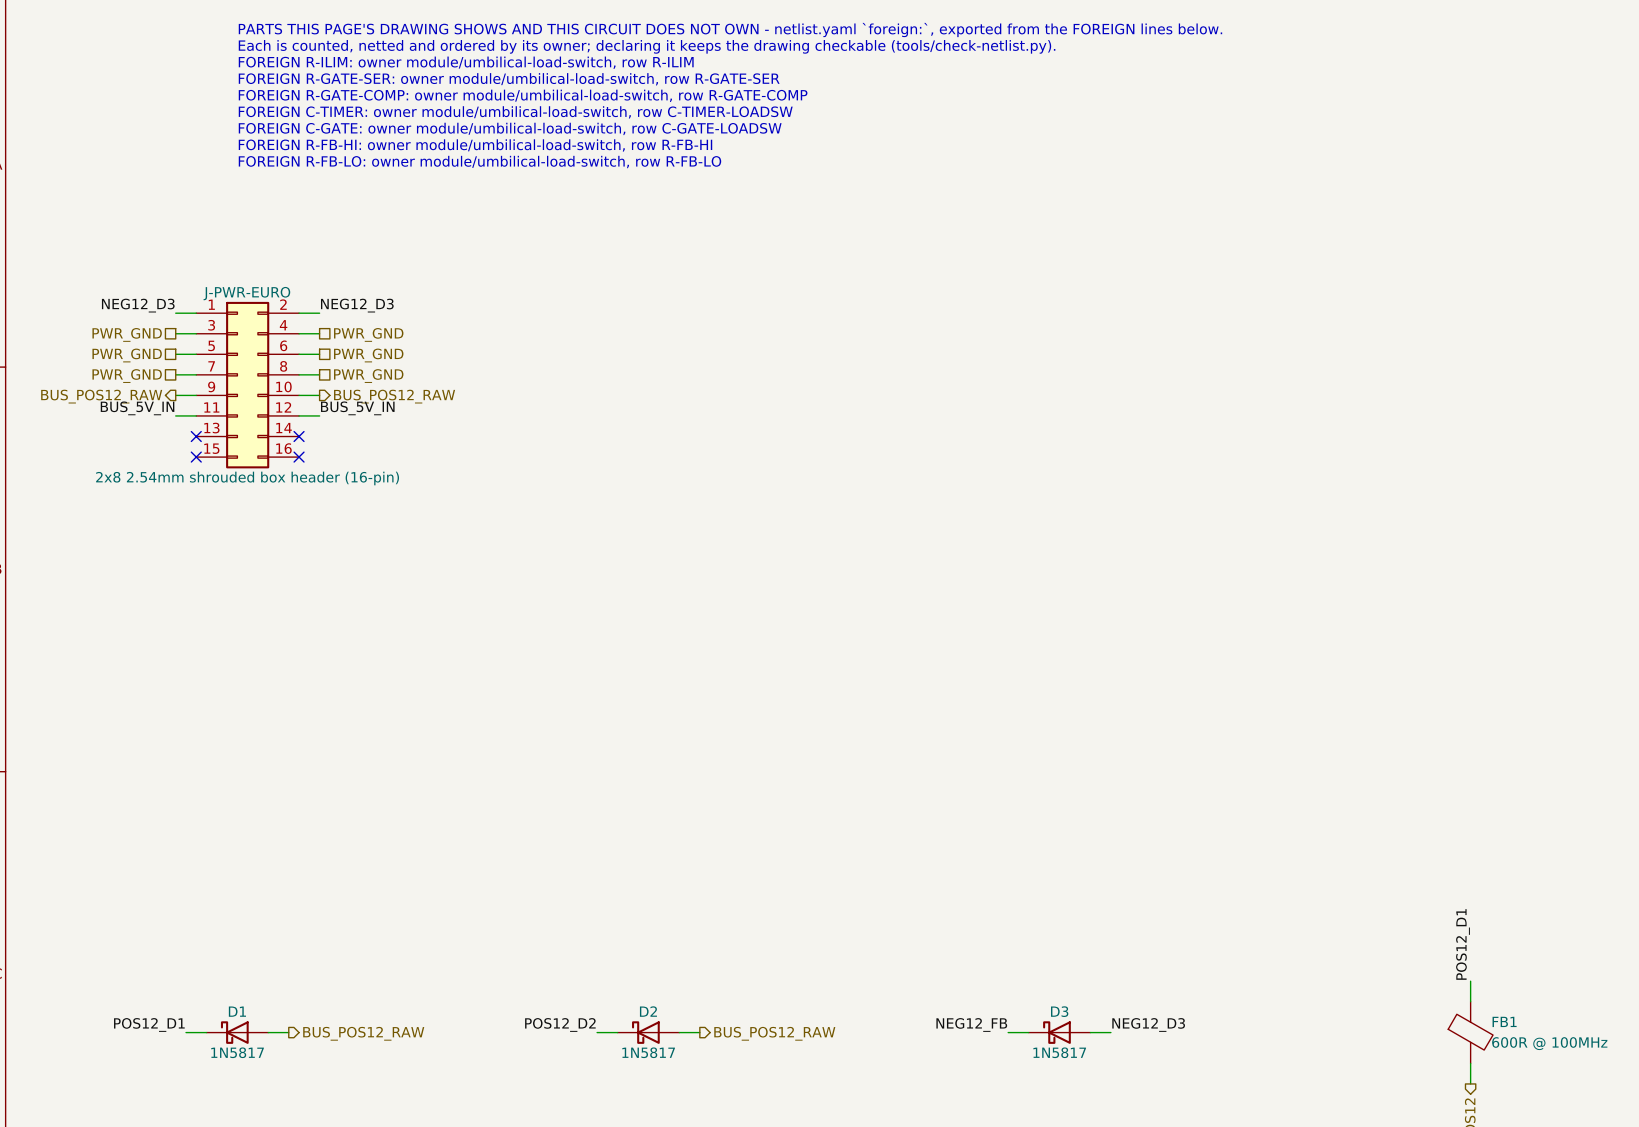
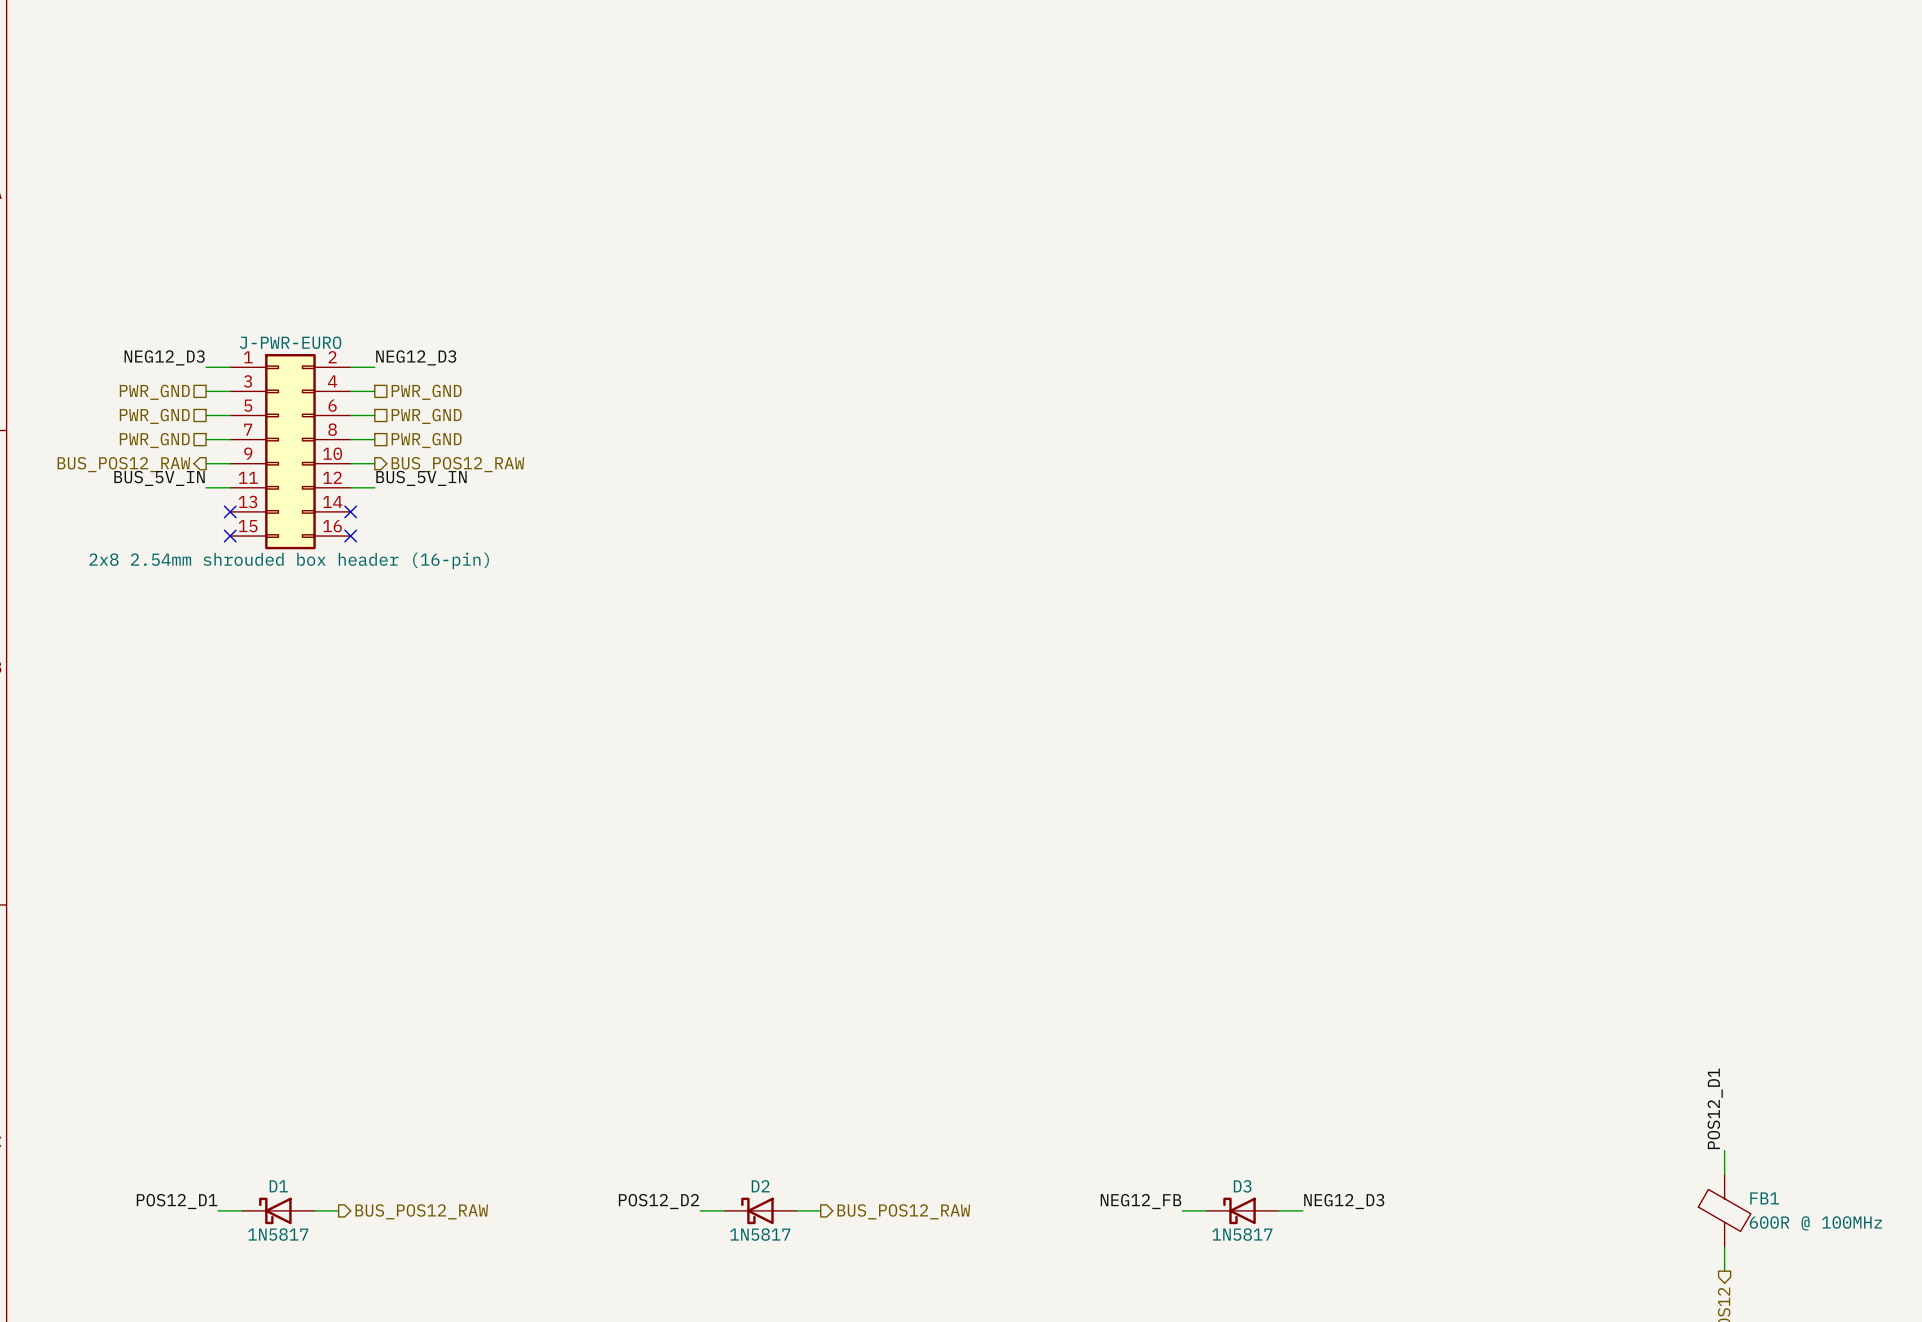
text: PARTS THIS PAGE'S DRAWING SHOWS AND THIS CIRCUIT DOES NOT OWN - netlist.yaml `foreign:`, exported from the FOREIGN lines below. (730, 30) -> none
text: Each is counted, netted and ordered by its owner; declaring it keeps the drawing checkable (tools/check-netlist.py). (647, 46) -> none
text: FOREIGN R-ILIM: owner module/umbilical-load-switch, row R-ILIM (466, 62) -> none
text: FOREIGN R-GATE-SER: owner module/umbilical-load-switch, row R-GATE-SER (509, 79) -> none
text: FOREIGN R-GATE-COMP: owner module/umbilical-load-switch, row R-GATE-COMP (523, 95) -> none
text: FOREIGN C-TIMER: owner module/umbilical-load-switch, row C-TIMER-LOADSW (515, 112) -> none
text: FOREIGN C-GATE: owner module/umbilical-load-switch, row C-GATE-LOADSW (510, 128) -> none
text: FOREIGN R-FB-HI: owner module/umbilical-load-switch, row R-FB-HI (475, 145) -> none
text: FOREIGN R-FB-LO: owner module/umbilical-load-switch, row R-FB-LO (479, 162) -> none

